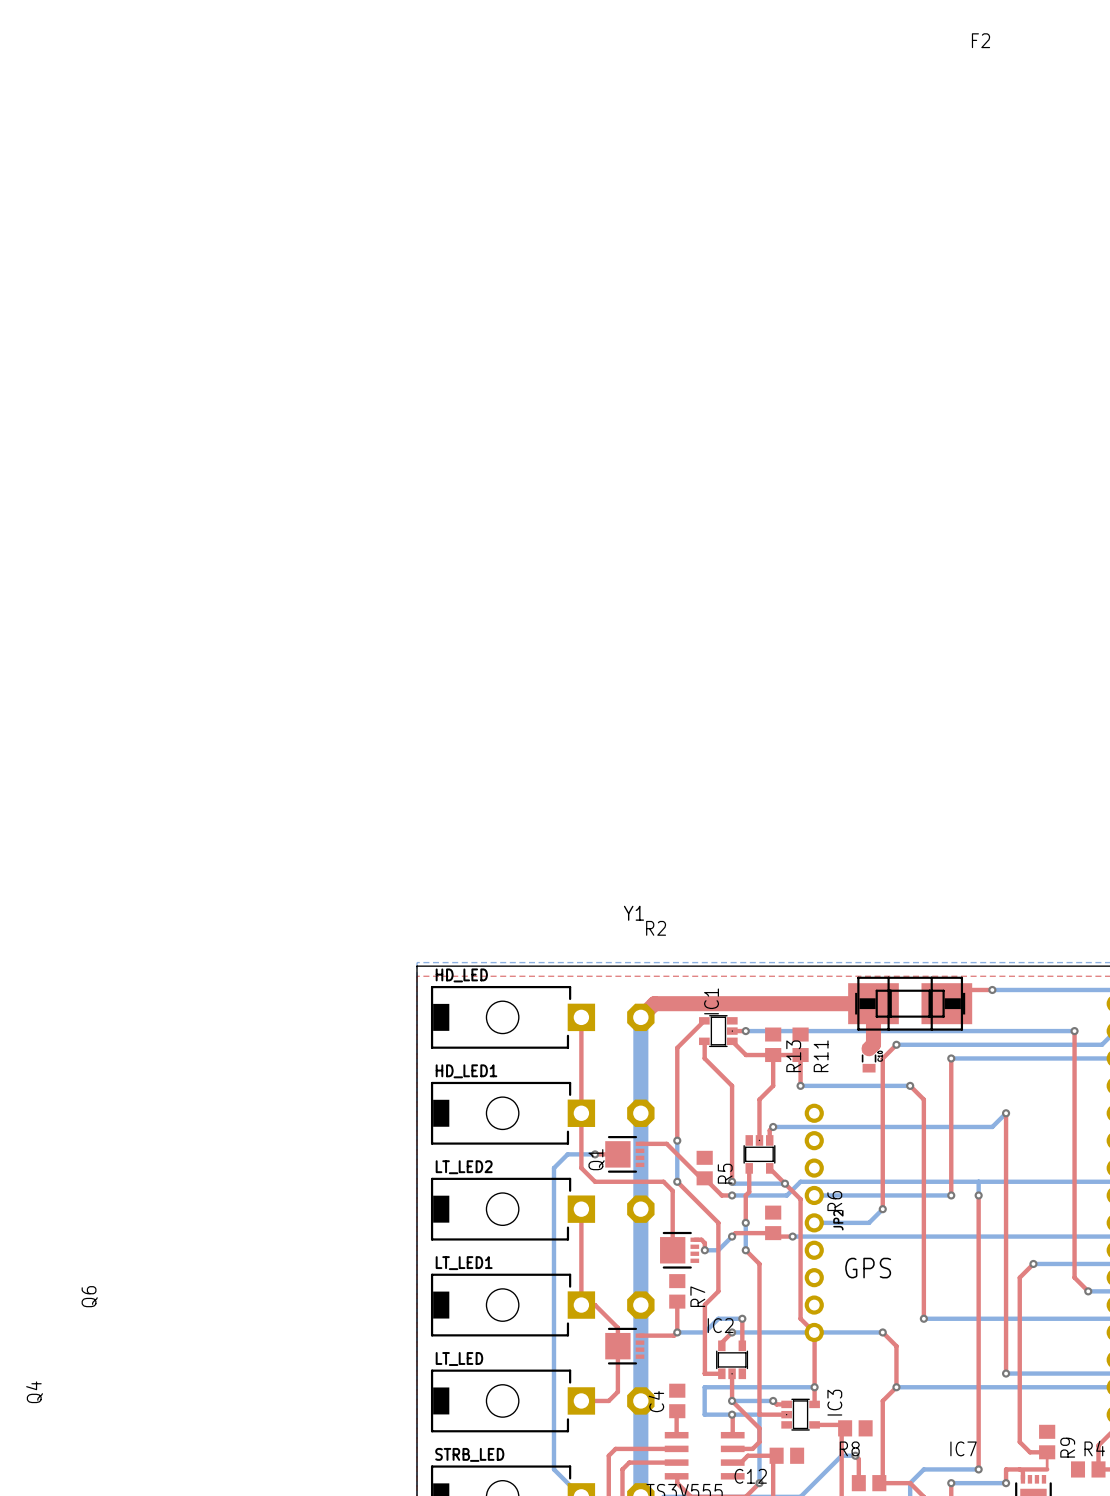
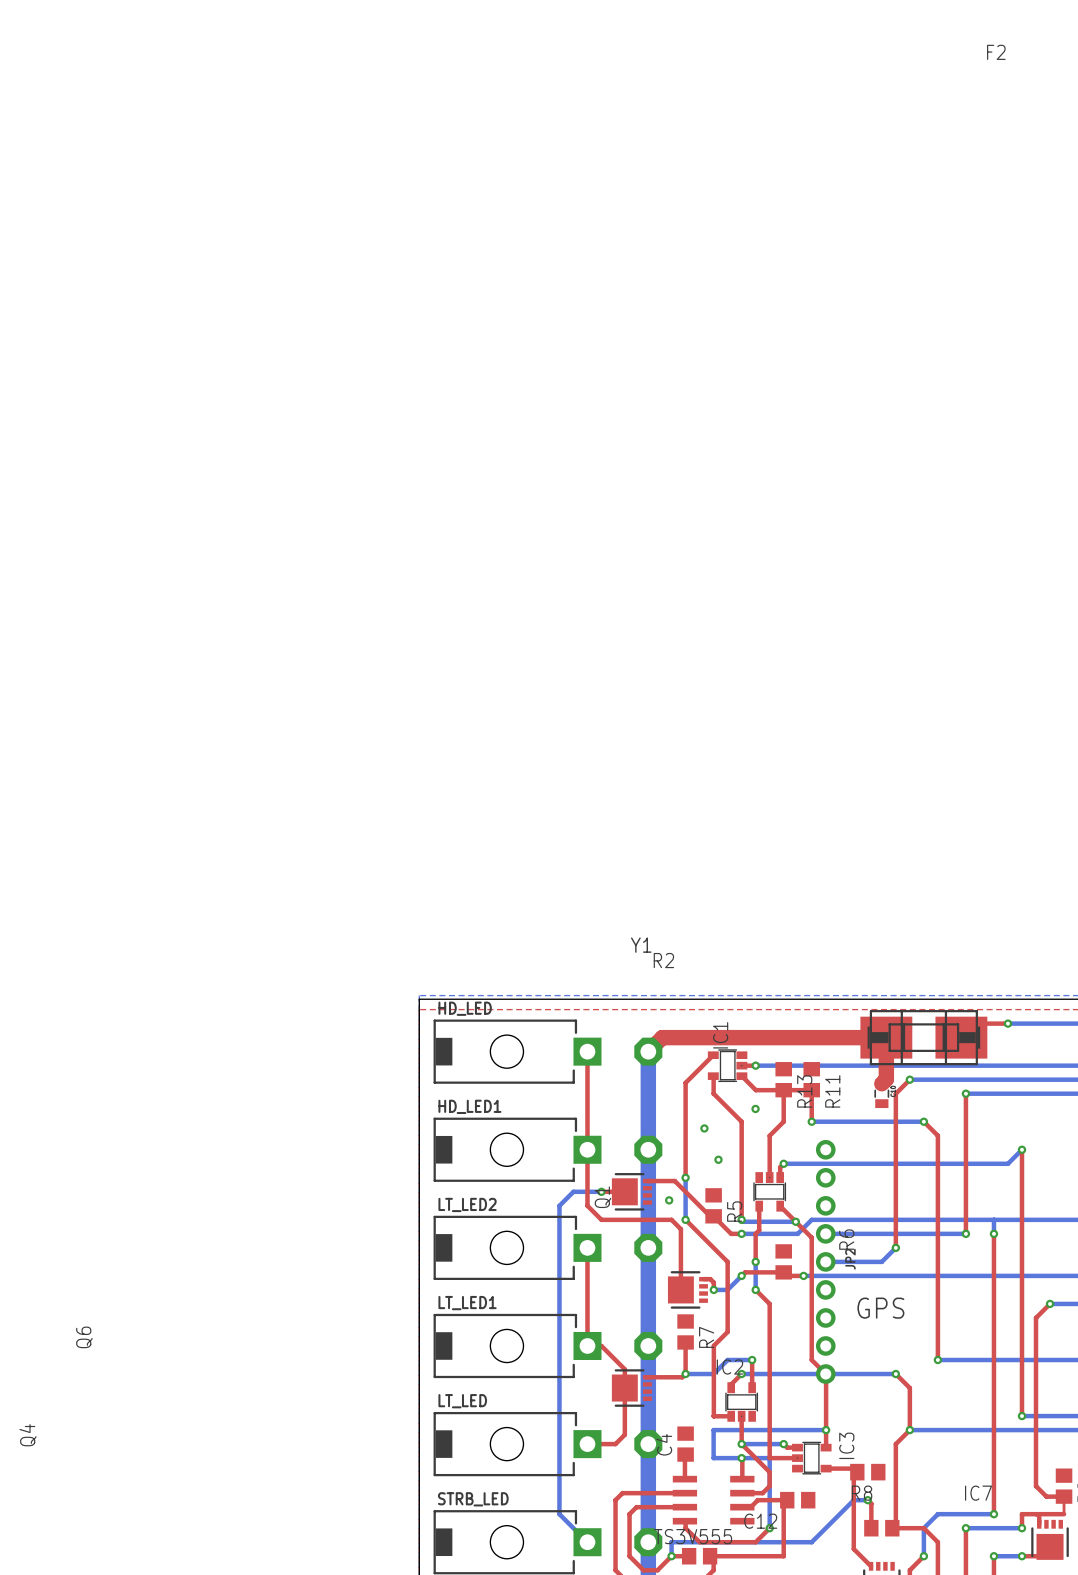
via: none -> (755, 1108)
via: none -> (704, 1128)
via: none -> (718, 1159)
via: none -> (669, 1200)

